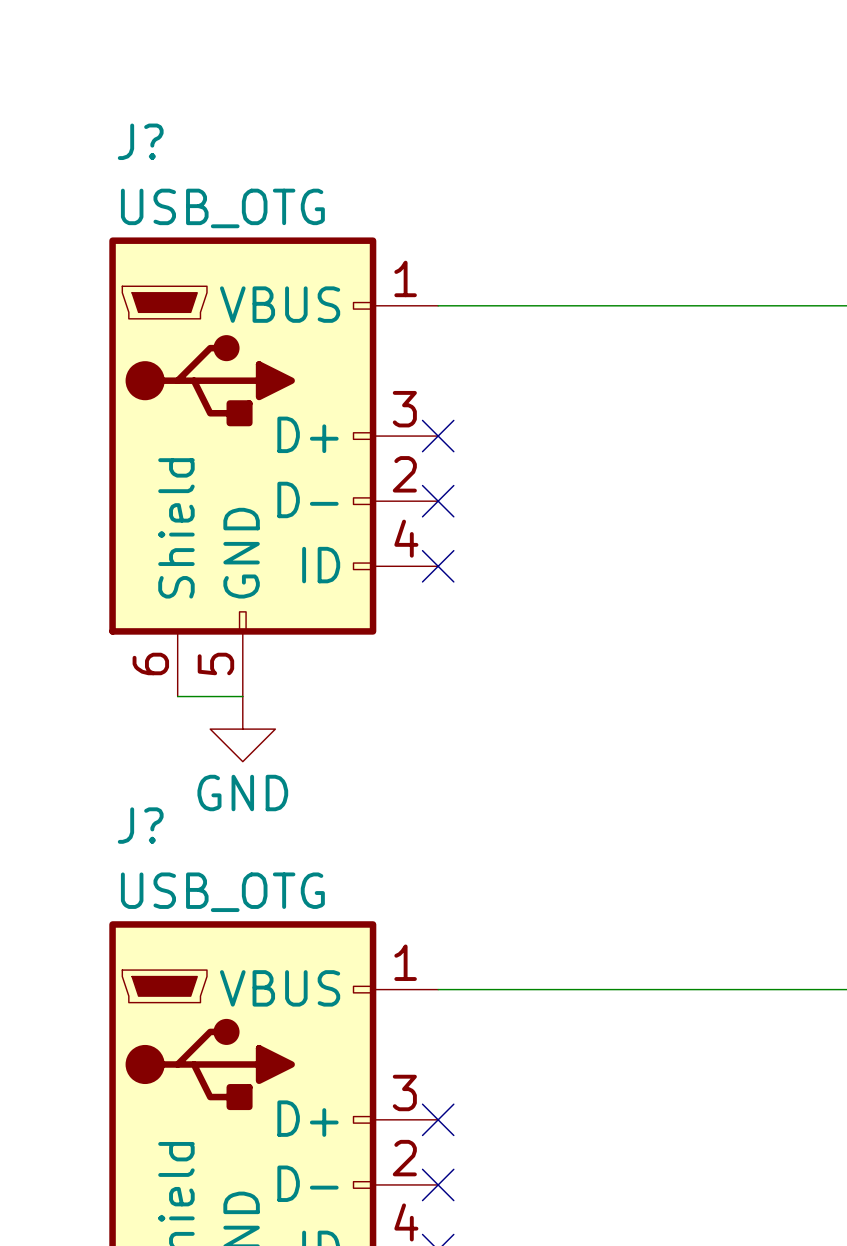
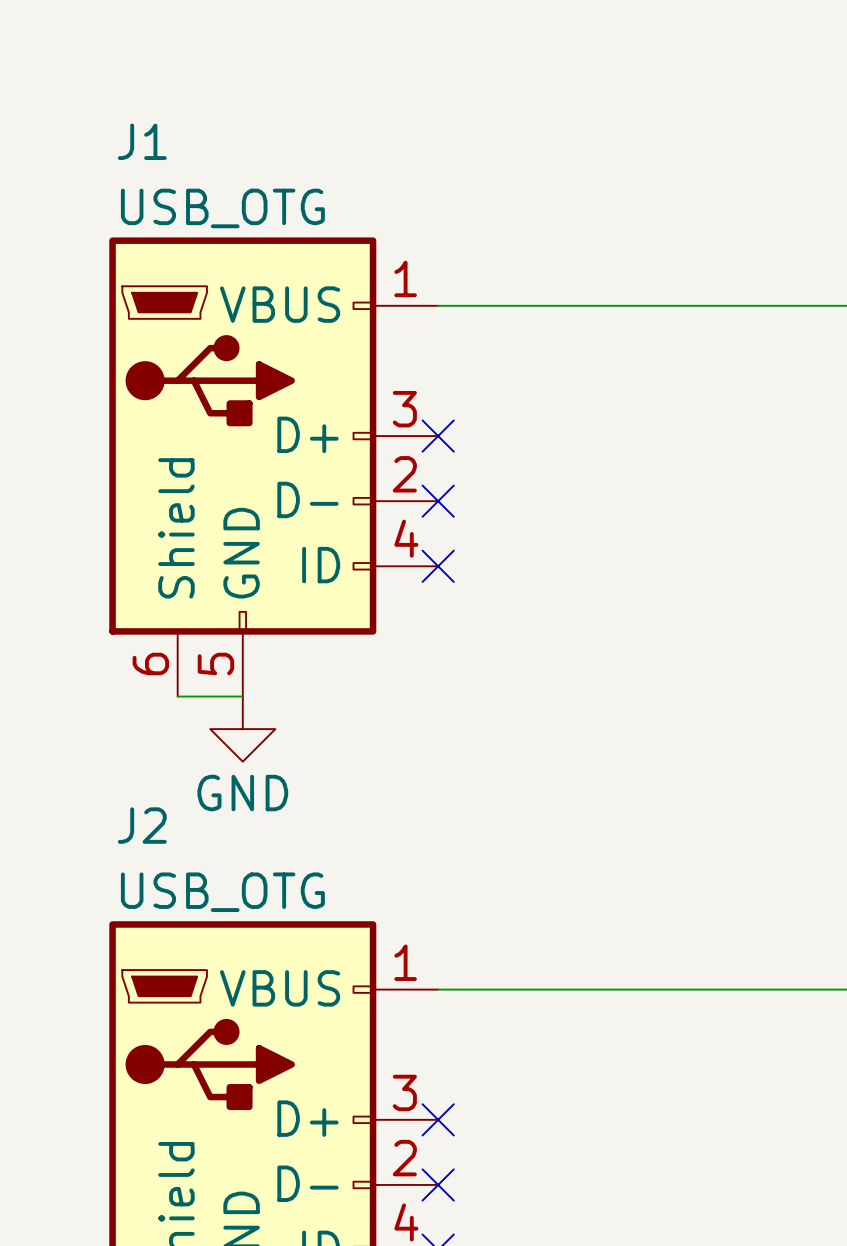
J? name: J? (140, 141) -> J1 (142, 141)
J? name: J? (140, 825) -> J2 (142, 825)

